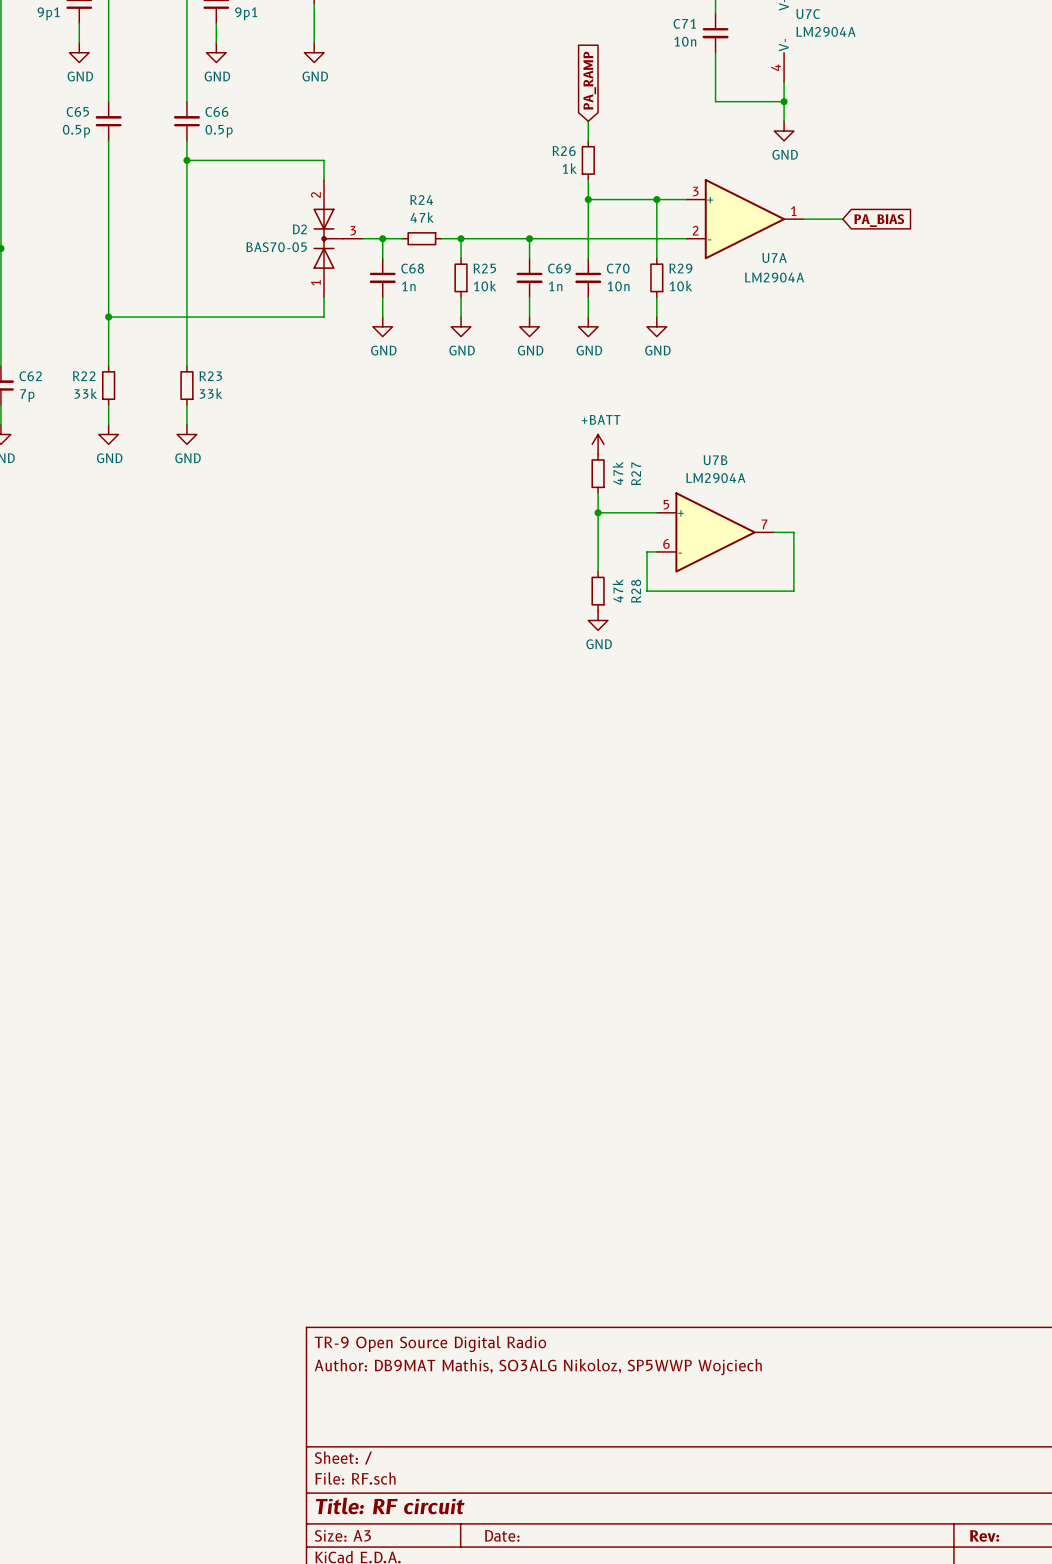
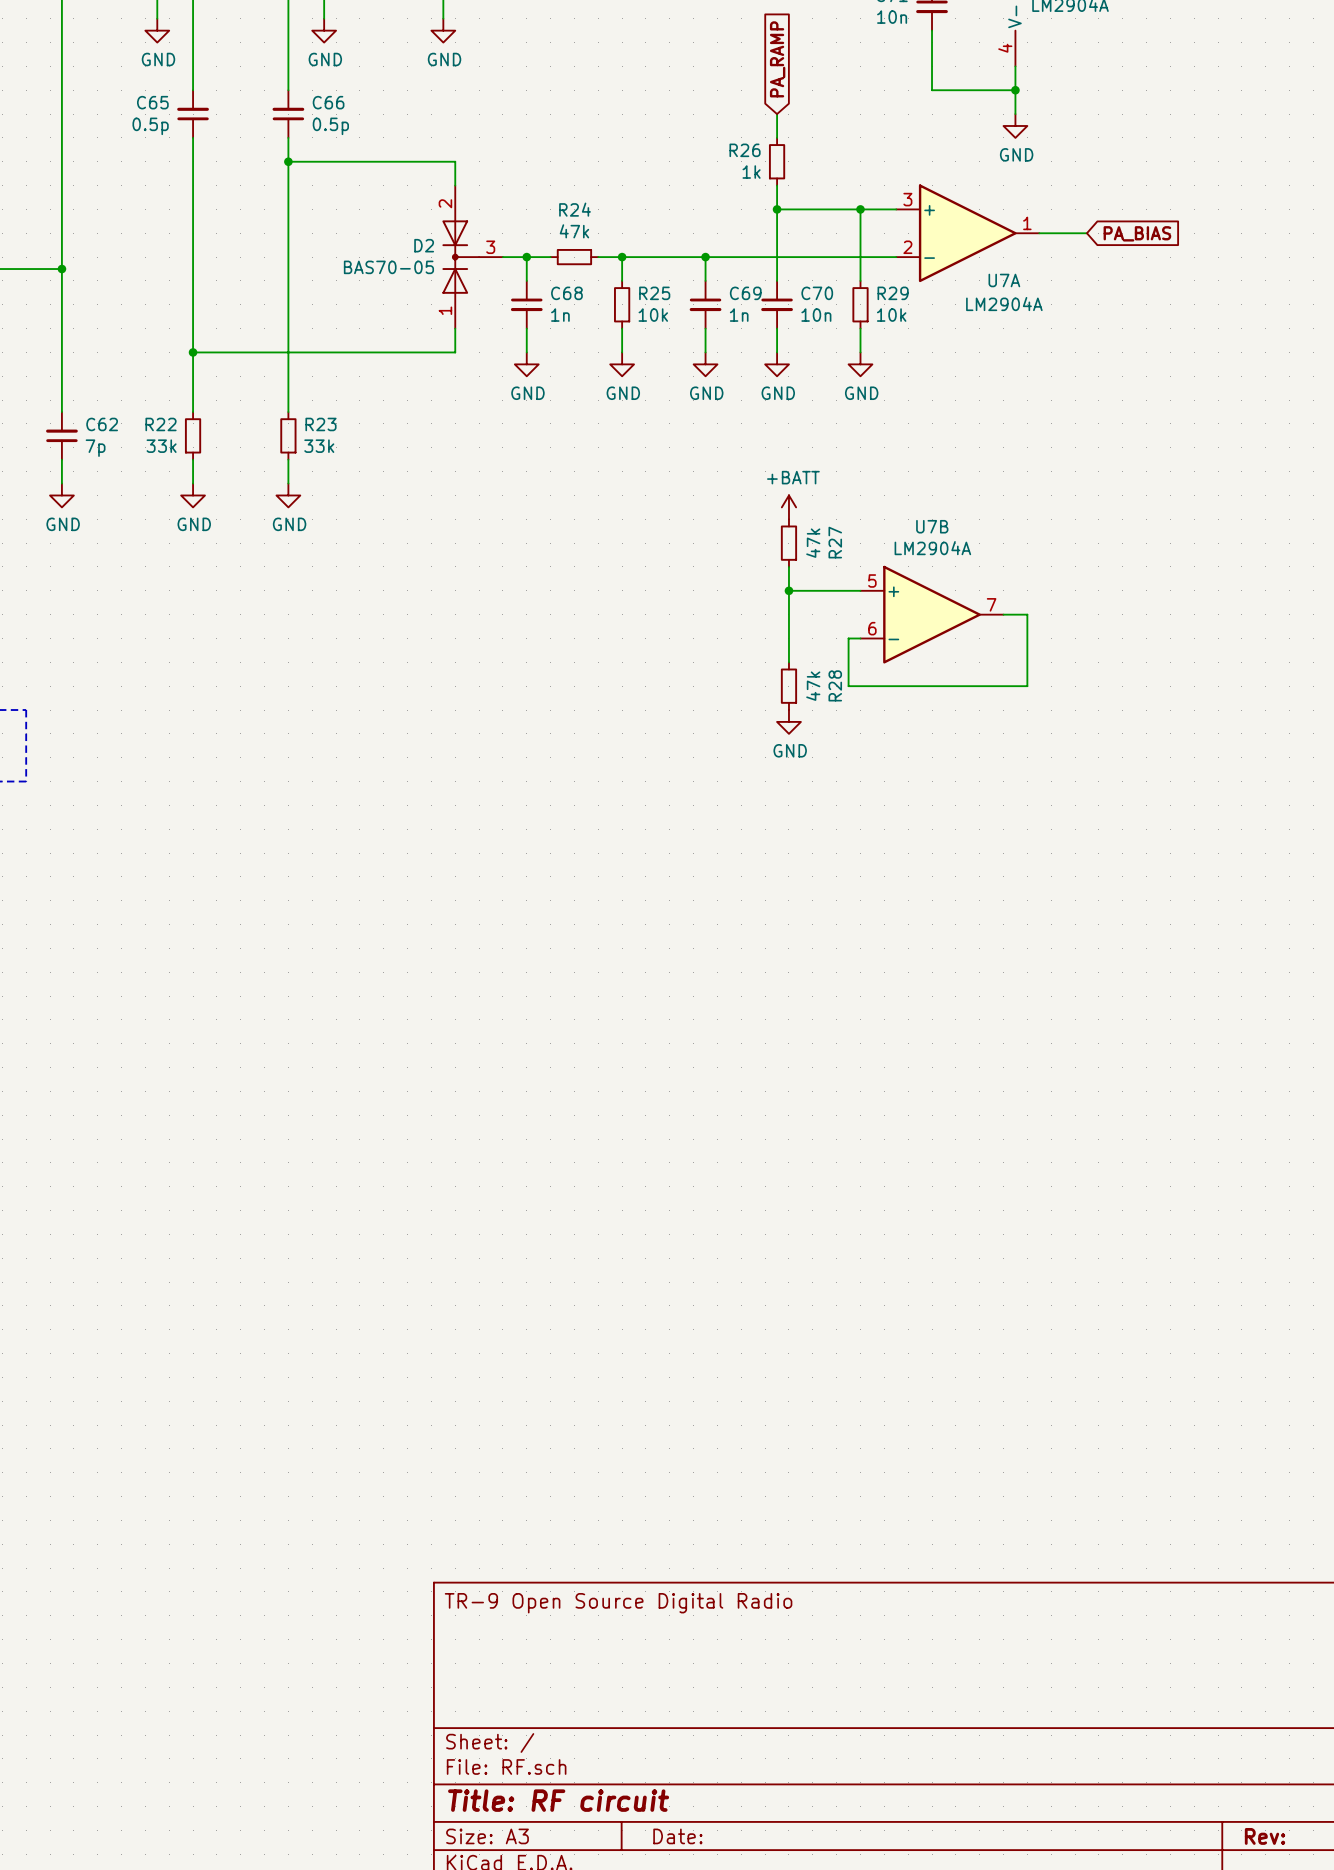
title block: Author: DB9MAT Mathis, SO3ALG Nikoloz, SP5WWP Wojciech (538, 1367) -> none

